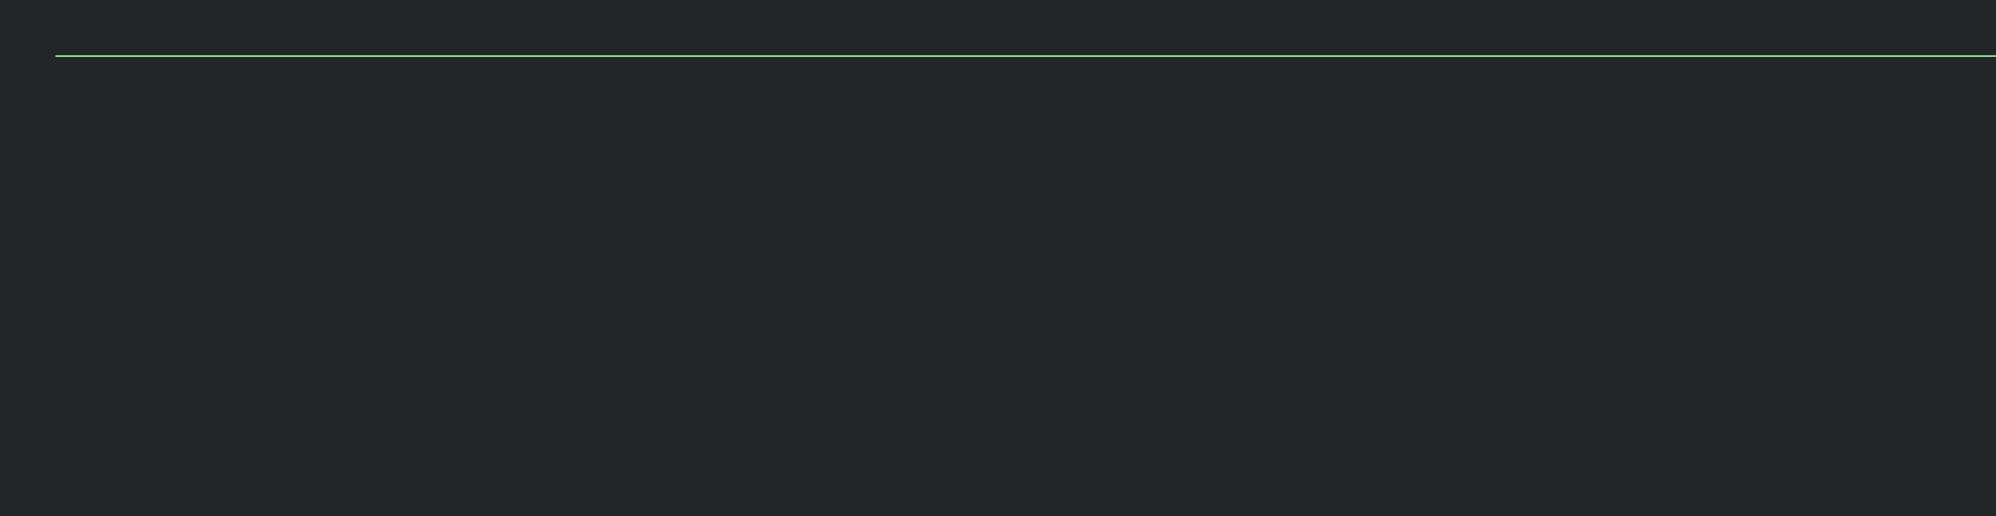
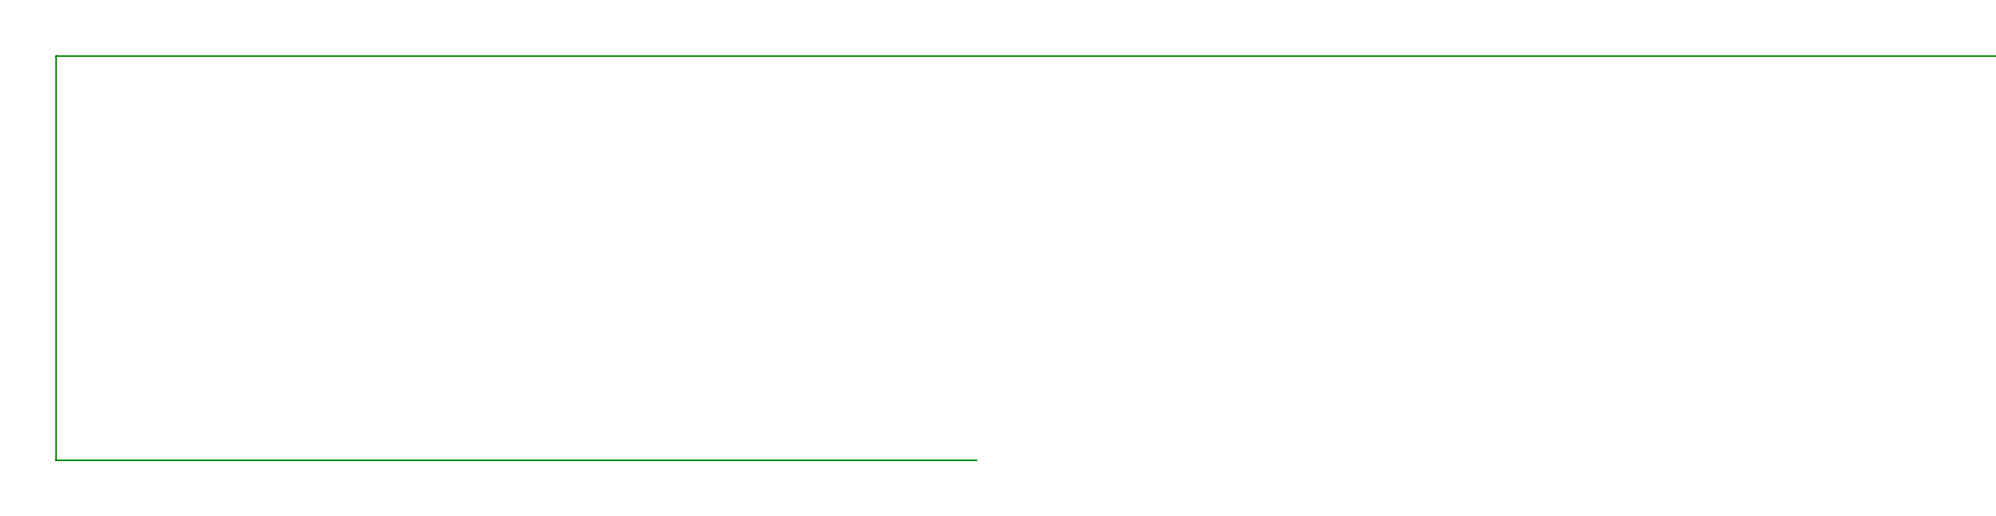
wire: none -> (56, 56) (56, 460) (976, 460)

